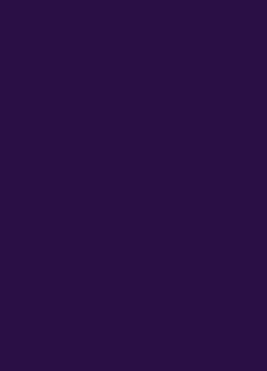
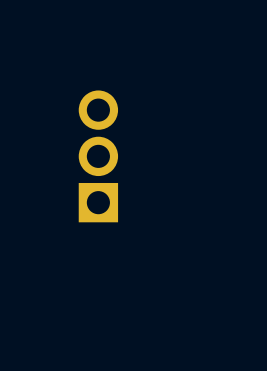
part: none -> (98, 156)

